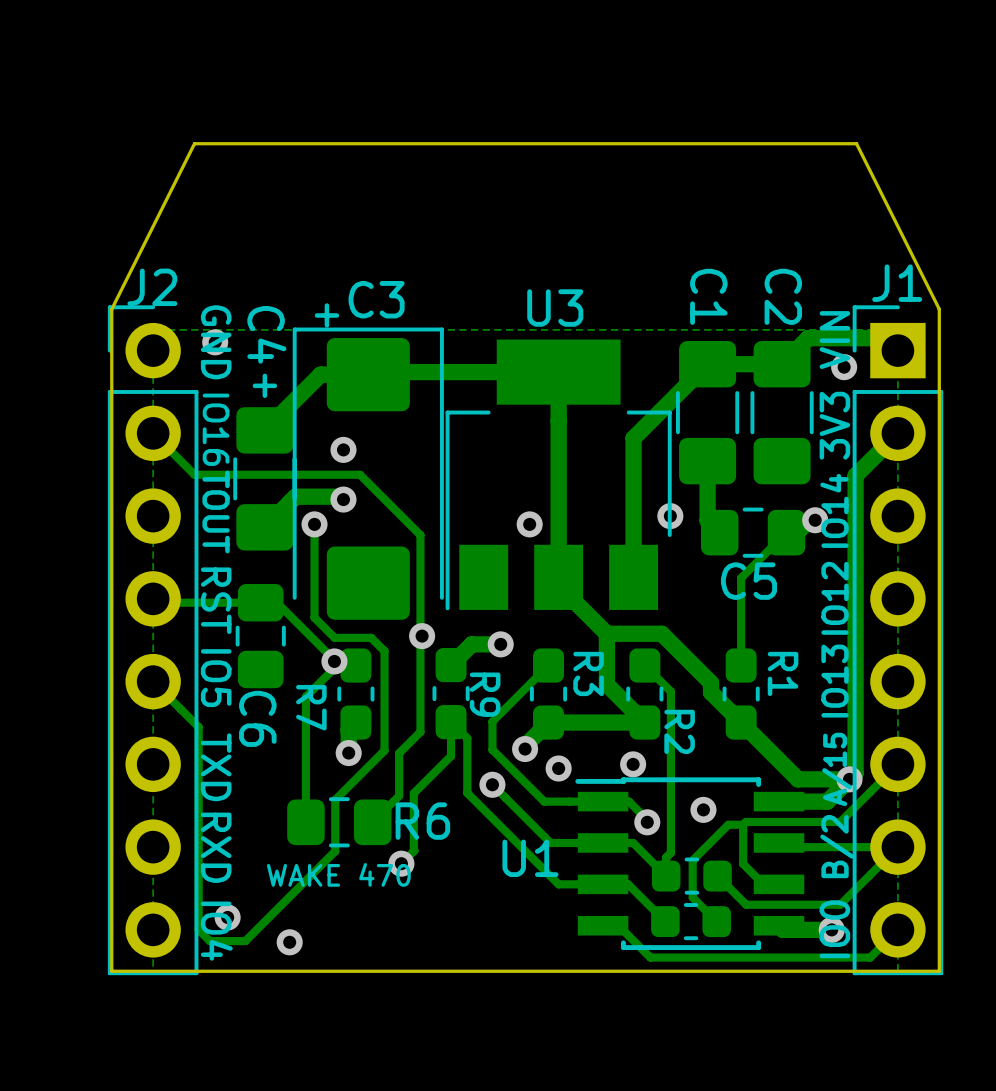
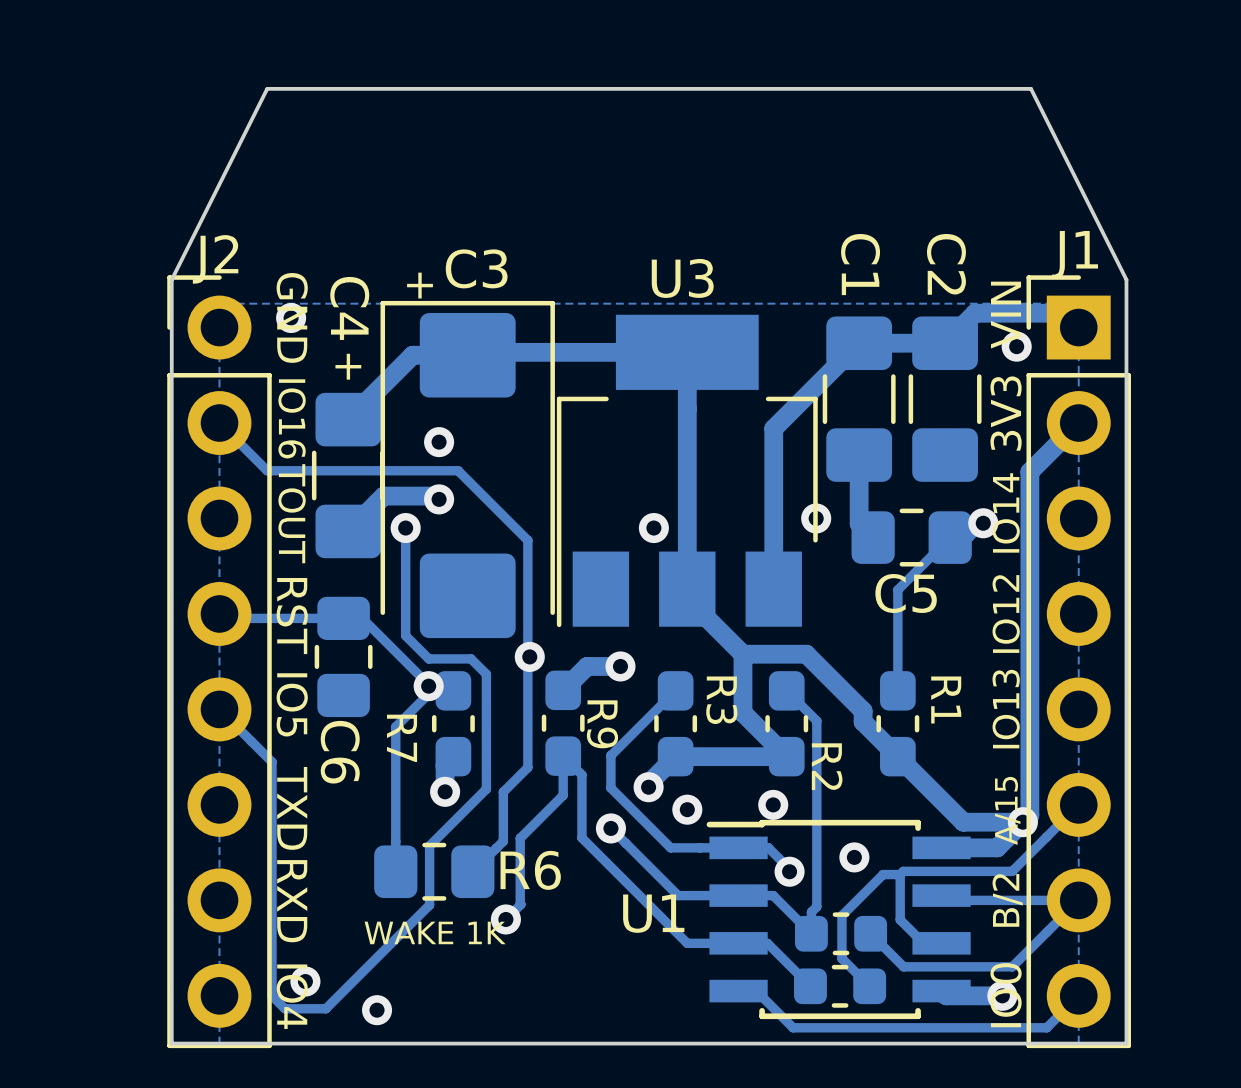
text: WAKE 470 (338, 874) -> WAKE 1K (435, 932)

